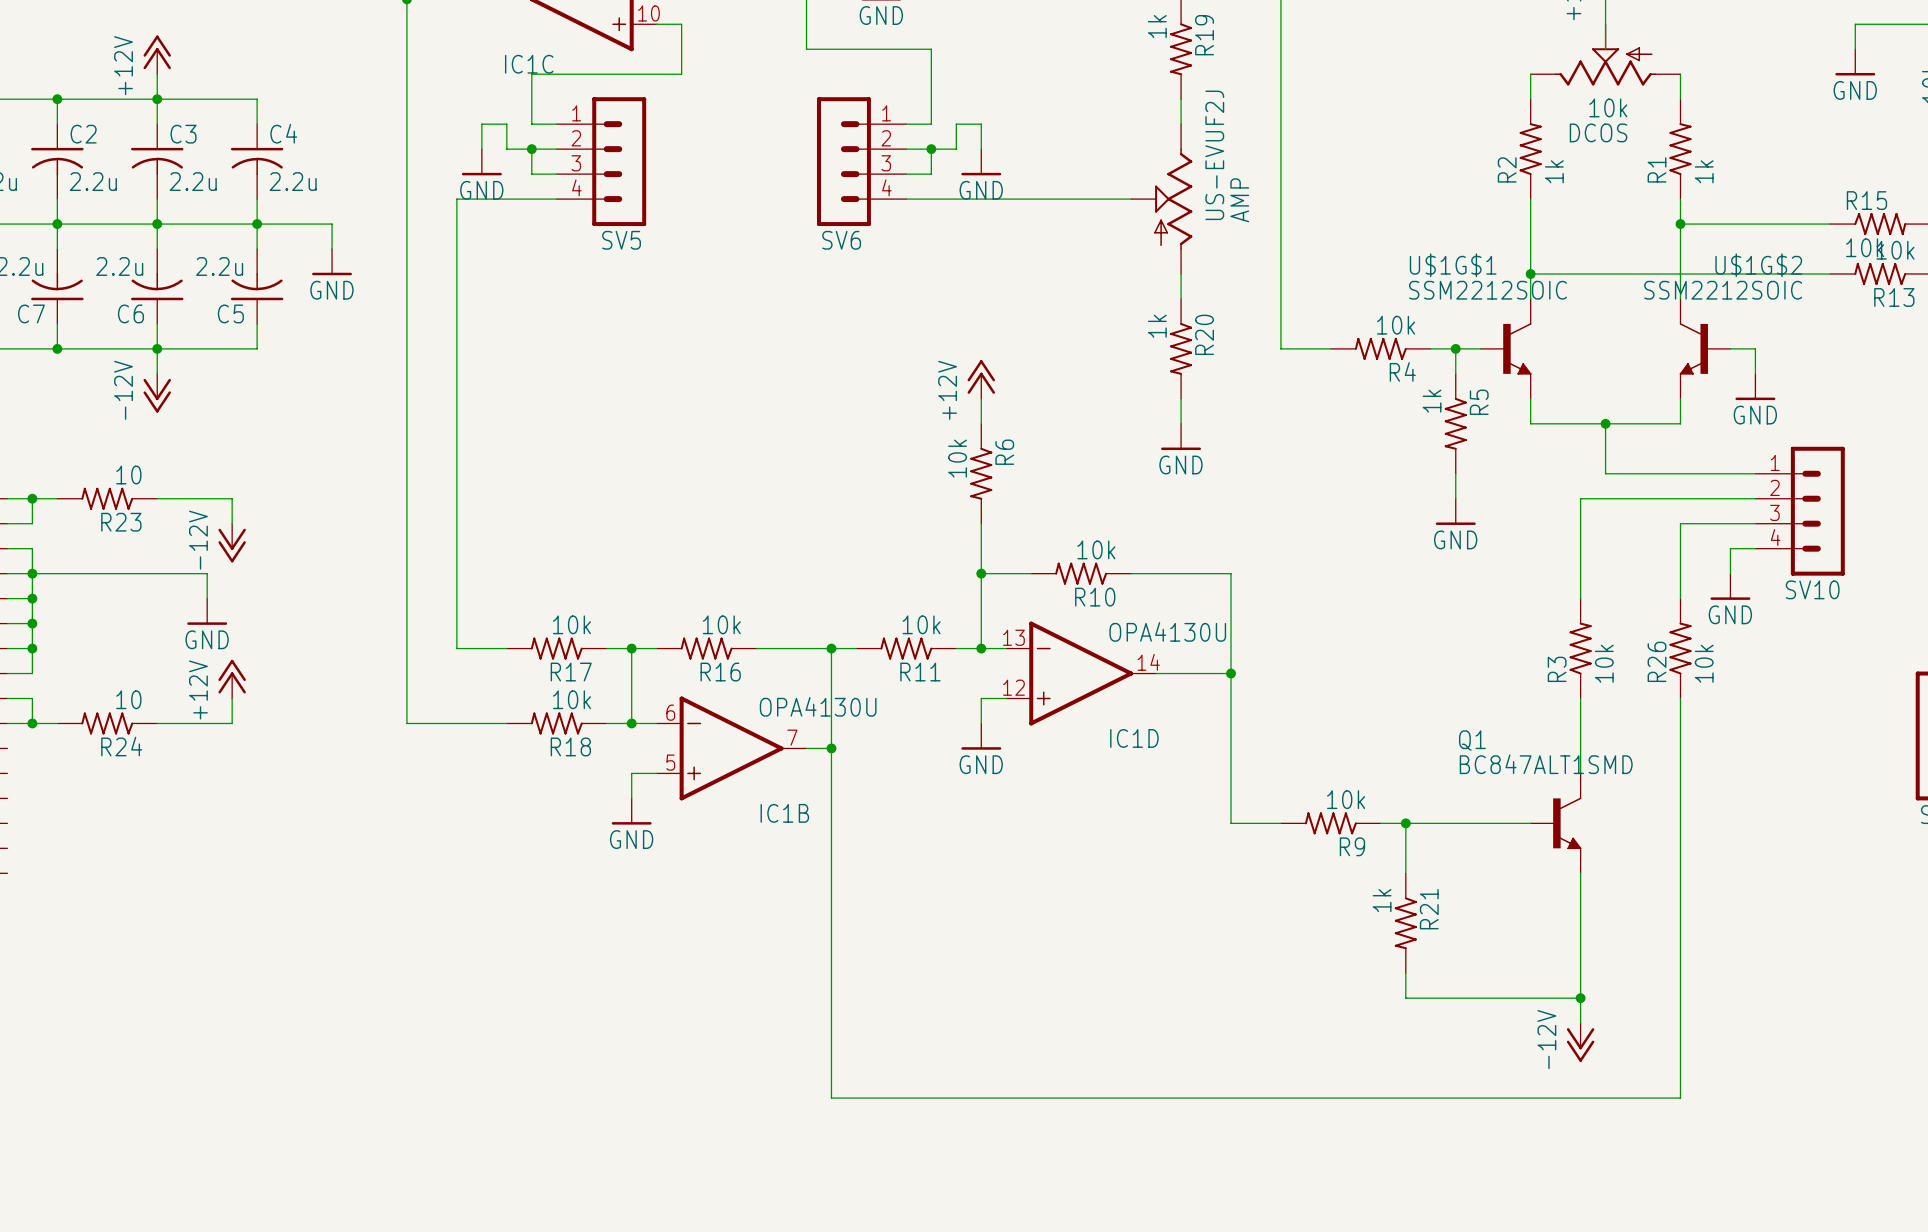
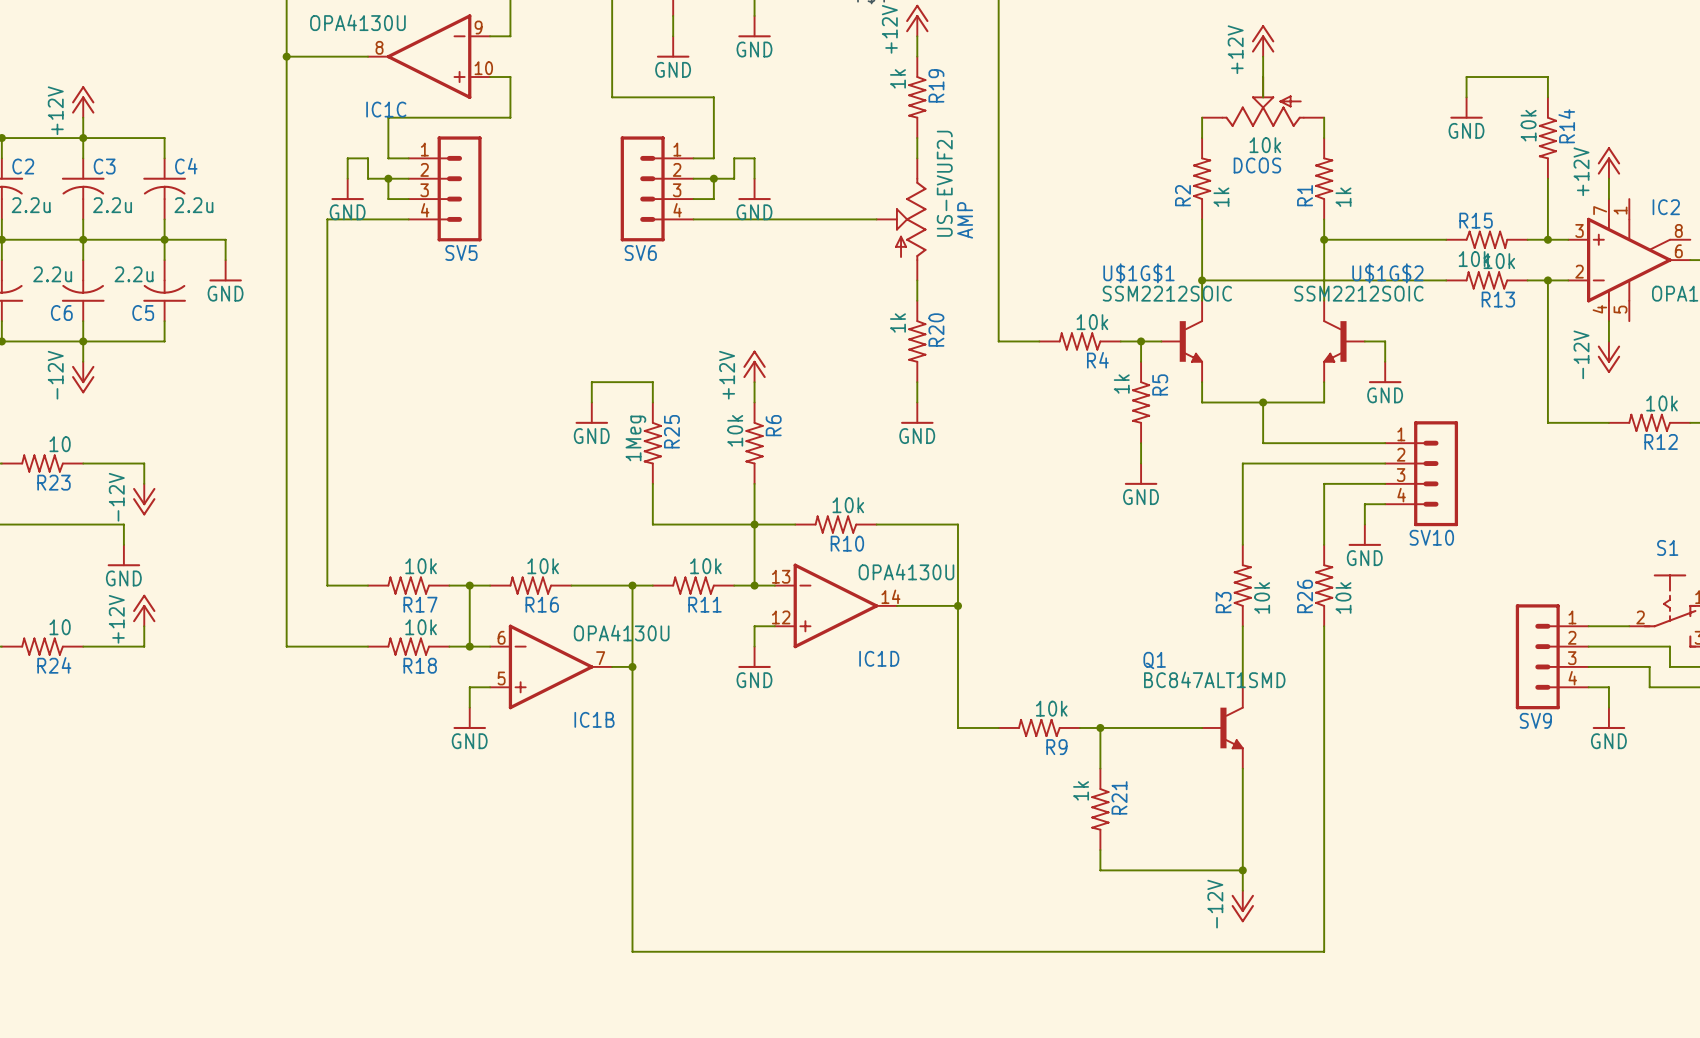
wire: none -> (591, 402) (591, 382) (652, 382) (652, 402)
power symbol: none -> GND (591, 413)
R25: none -> 1Meg (652, 443)
wire: none -> (652, 483) (652, 524) (754, 524)

